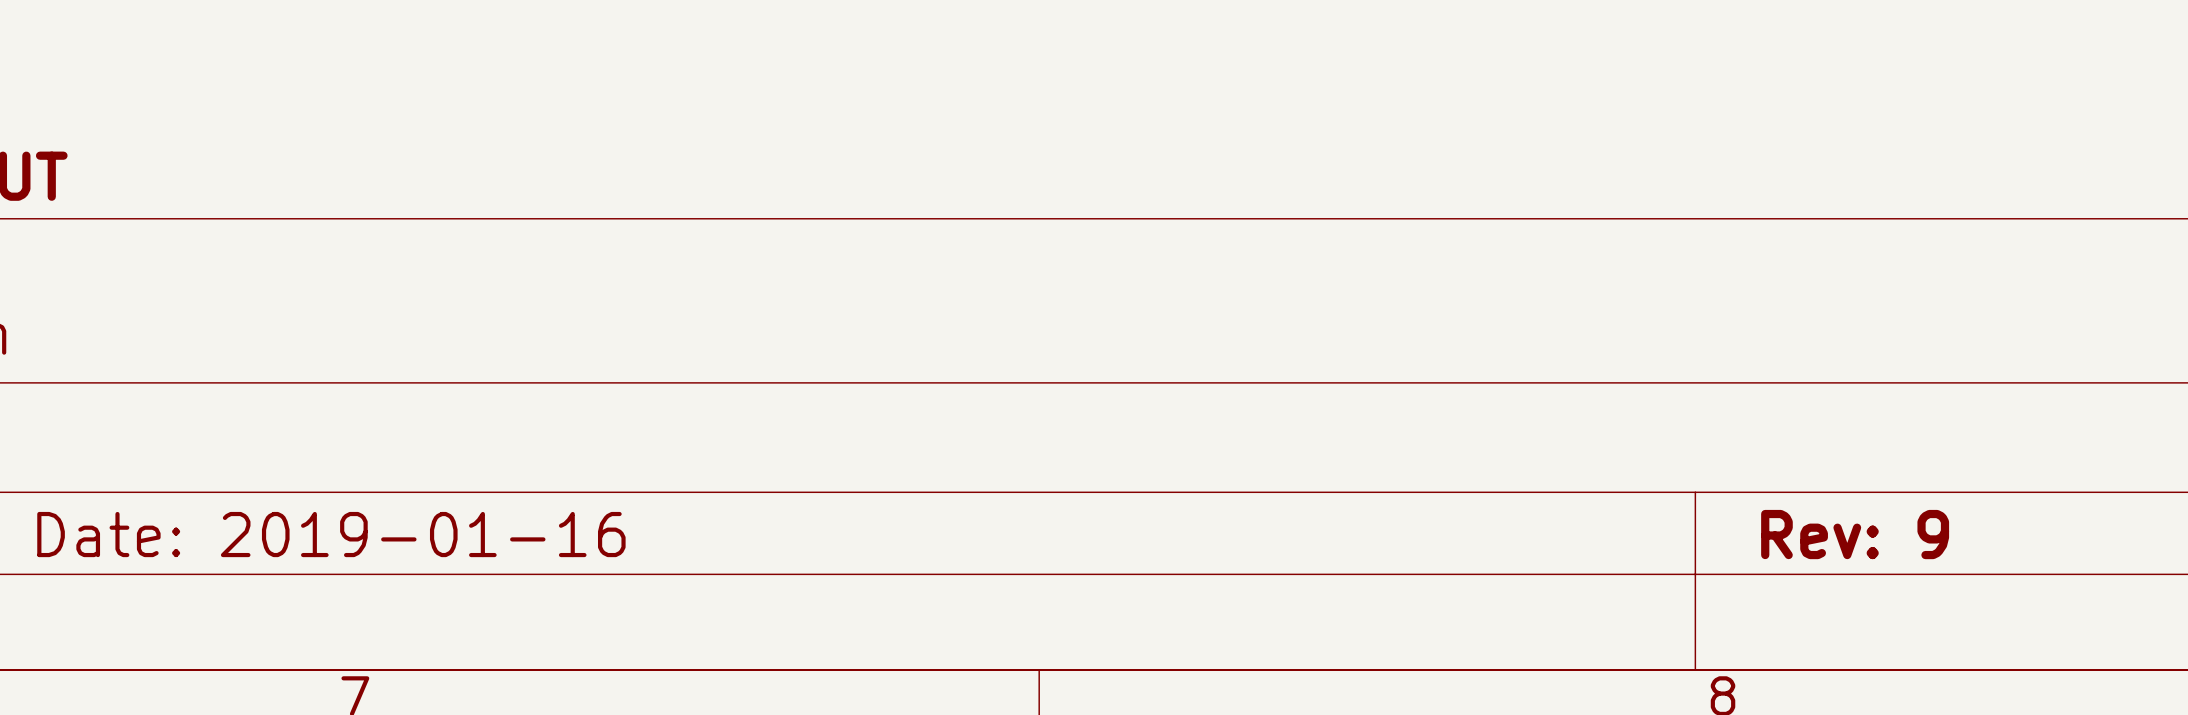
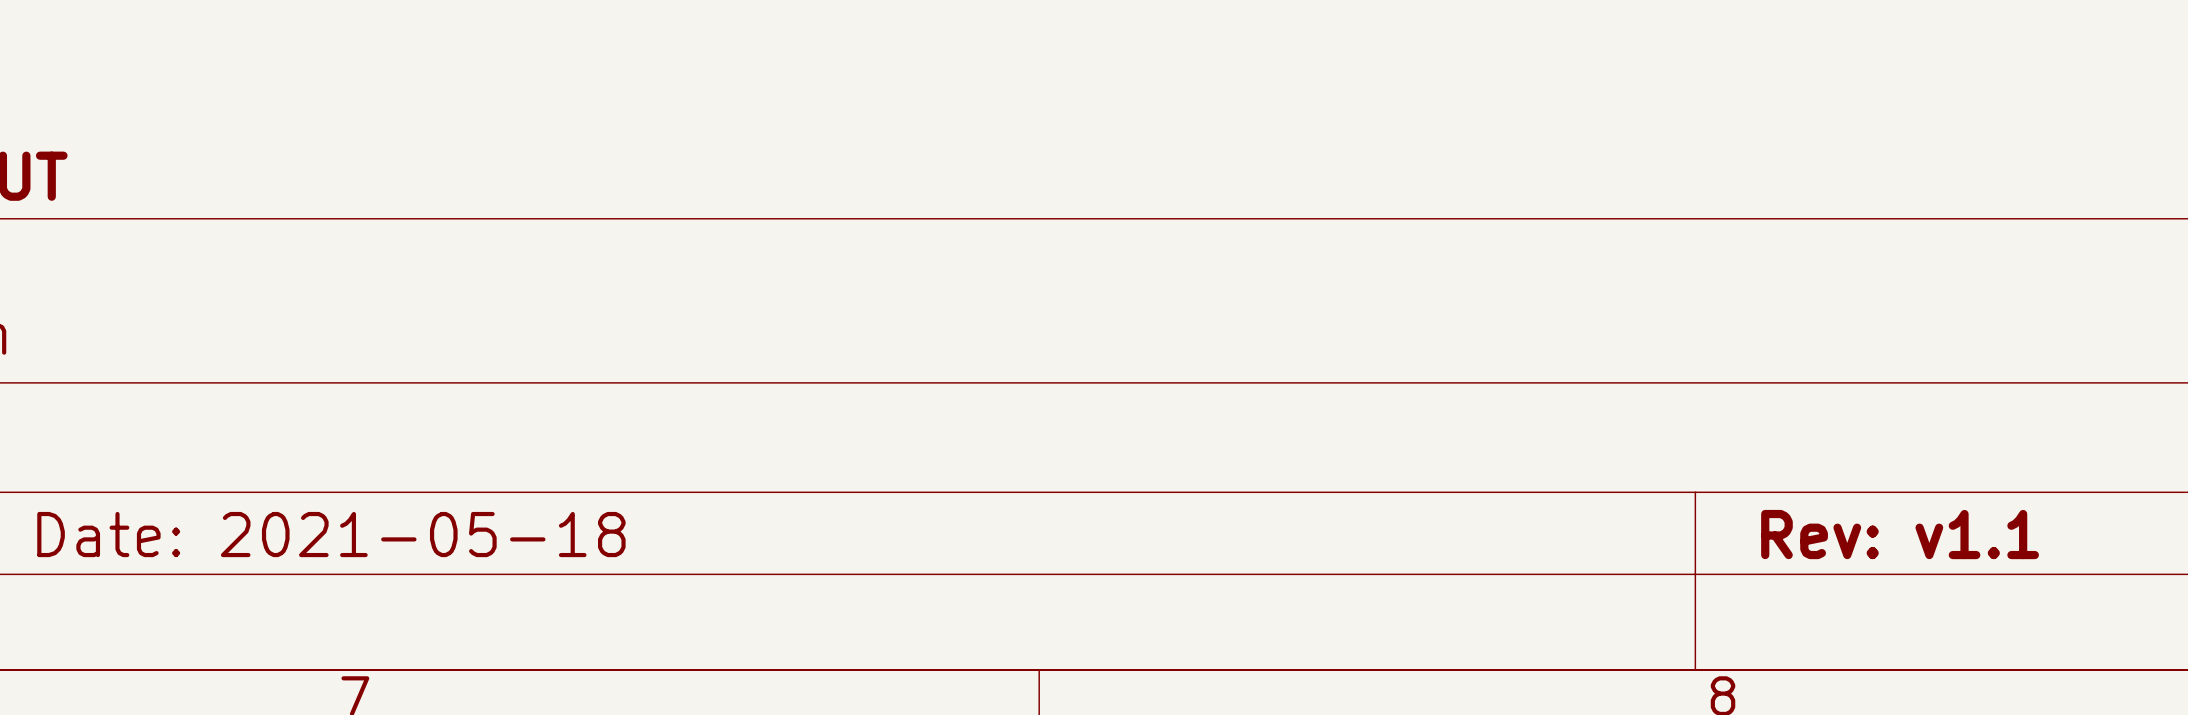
title block: Date: 2019-01-16 (331, 534) -> Date: 2021-05-18 (331, 534)
title block: Rev: 9 (1855, 534) -> Rev: v1.1 (1900, 534)

